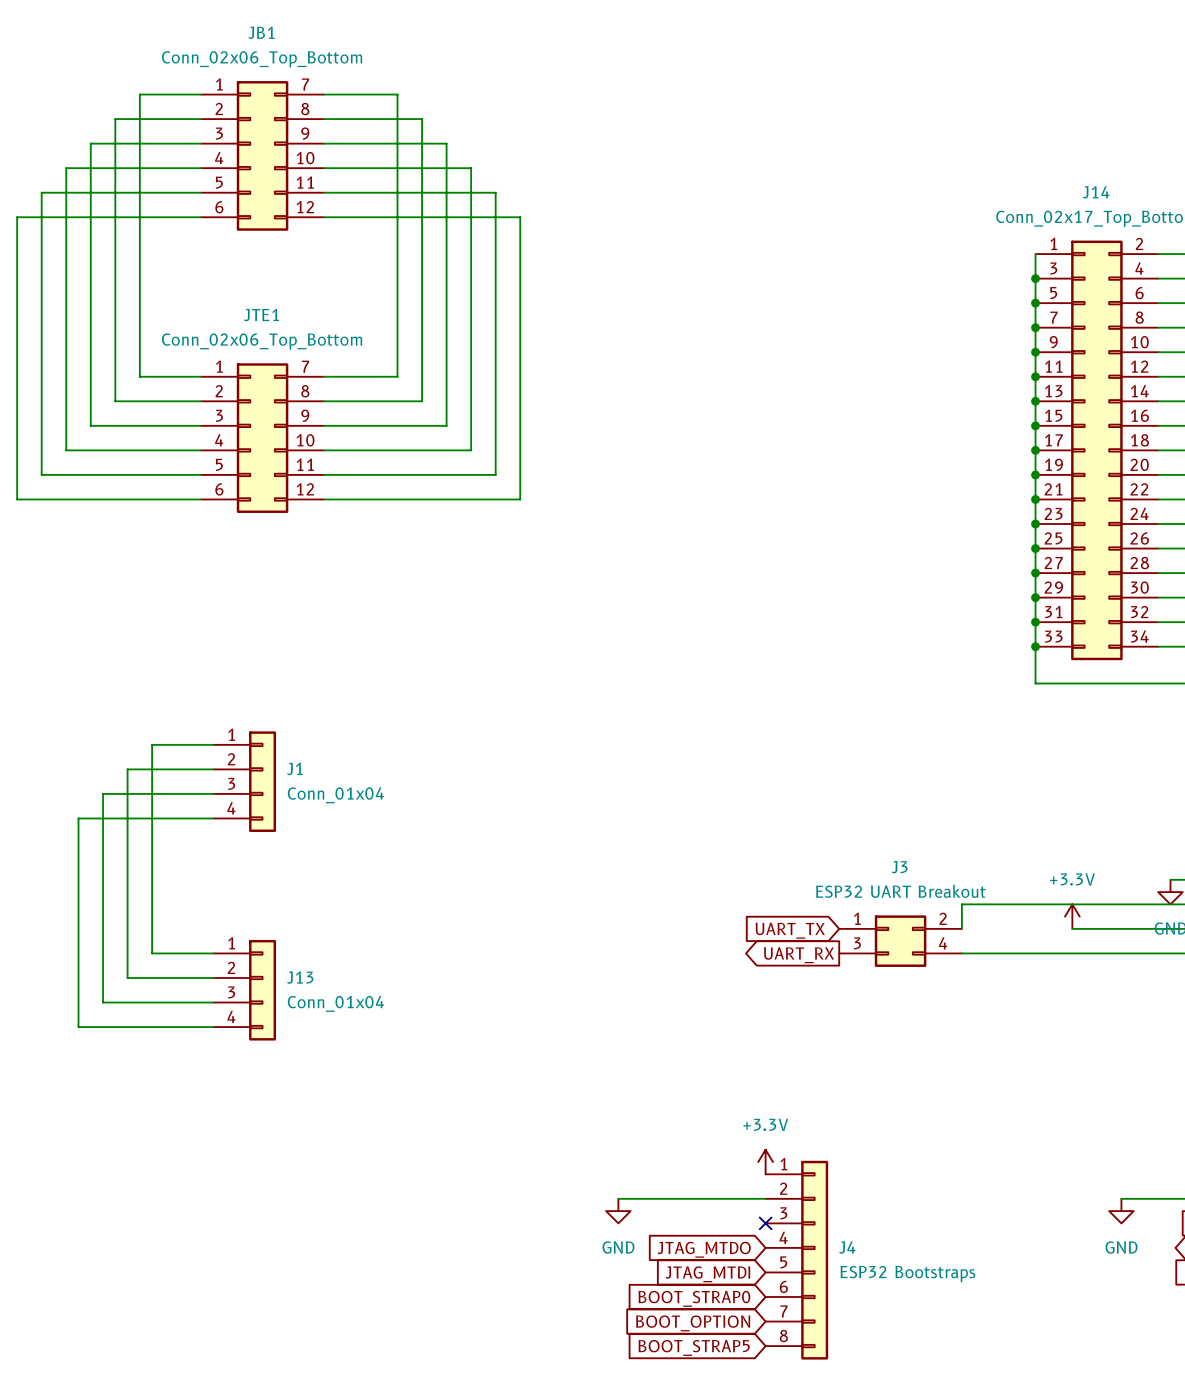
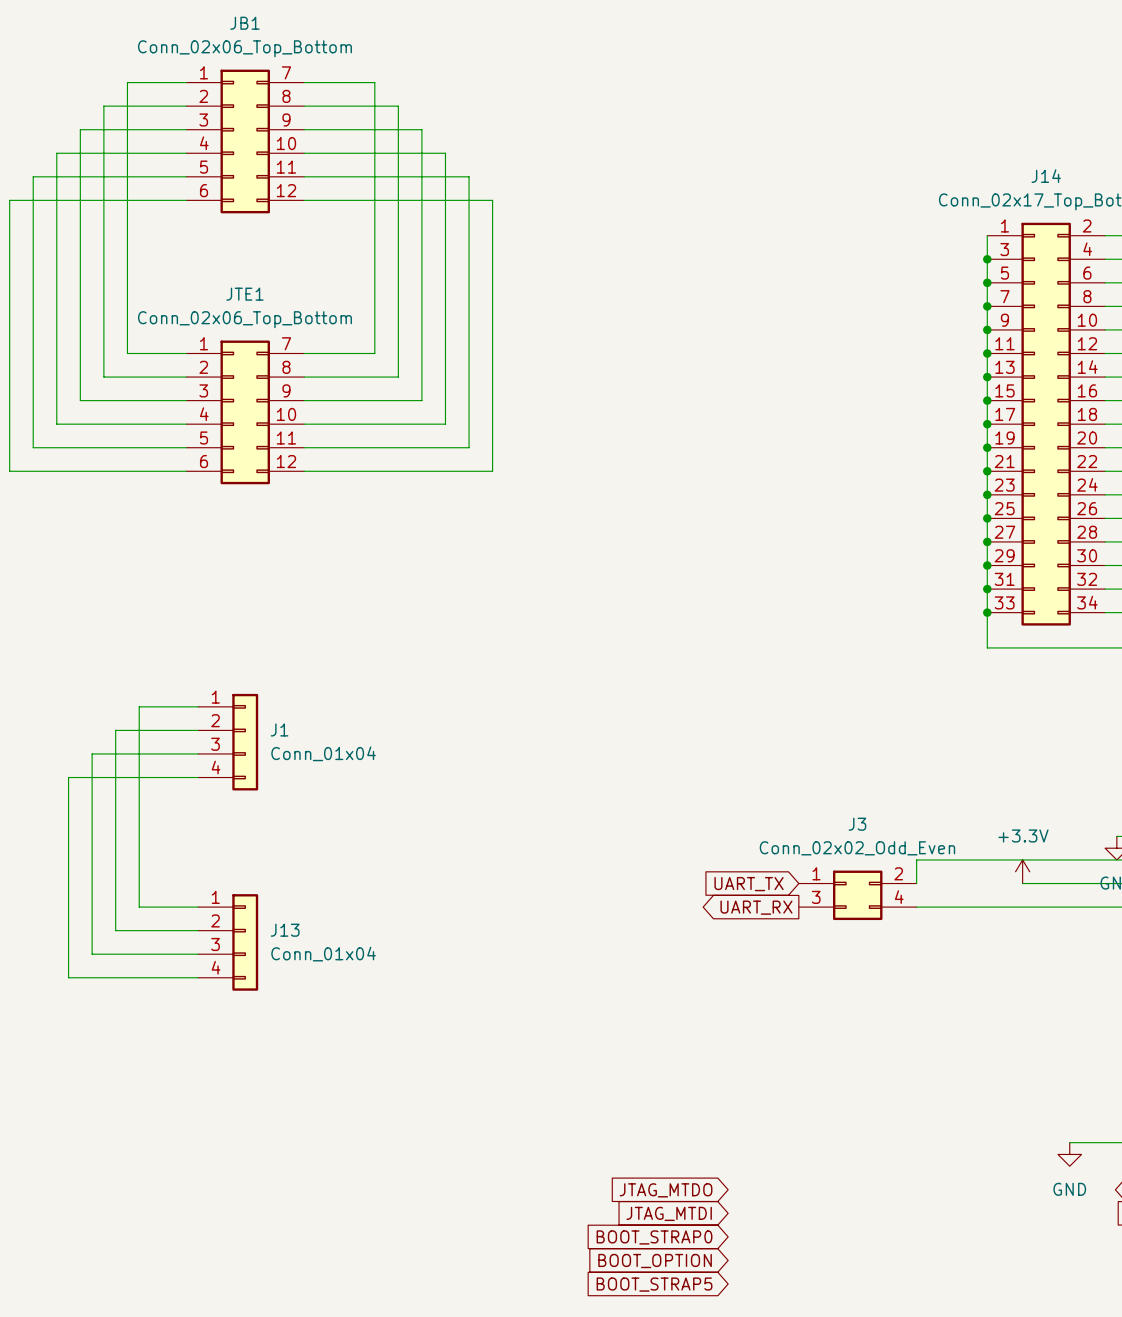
J3 value: ESP32 UART Breakout (900, 891) -> Conn_02x02_Odd_Even (857, 848)
power symbol: +3.3V (765, 1162) -> none
wire: (618, 1198) (765, 1198) -> none
power symbol: GND (618, 1211) -> none
no-connect mark: (765, 1223) -> none
J4: ESP32 Bootstraps (796, 1260) -> none

